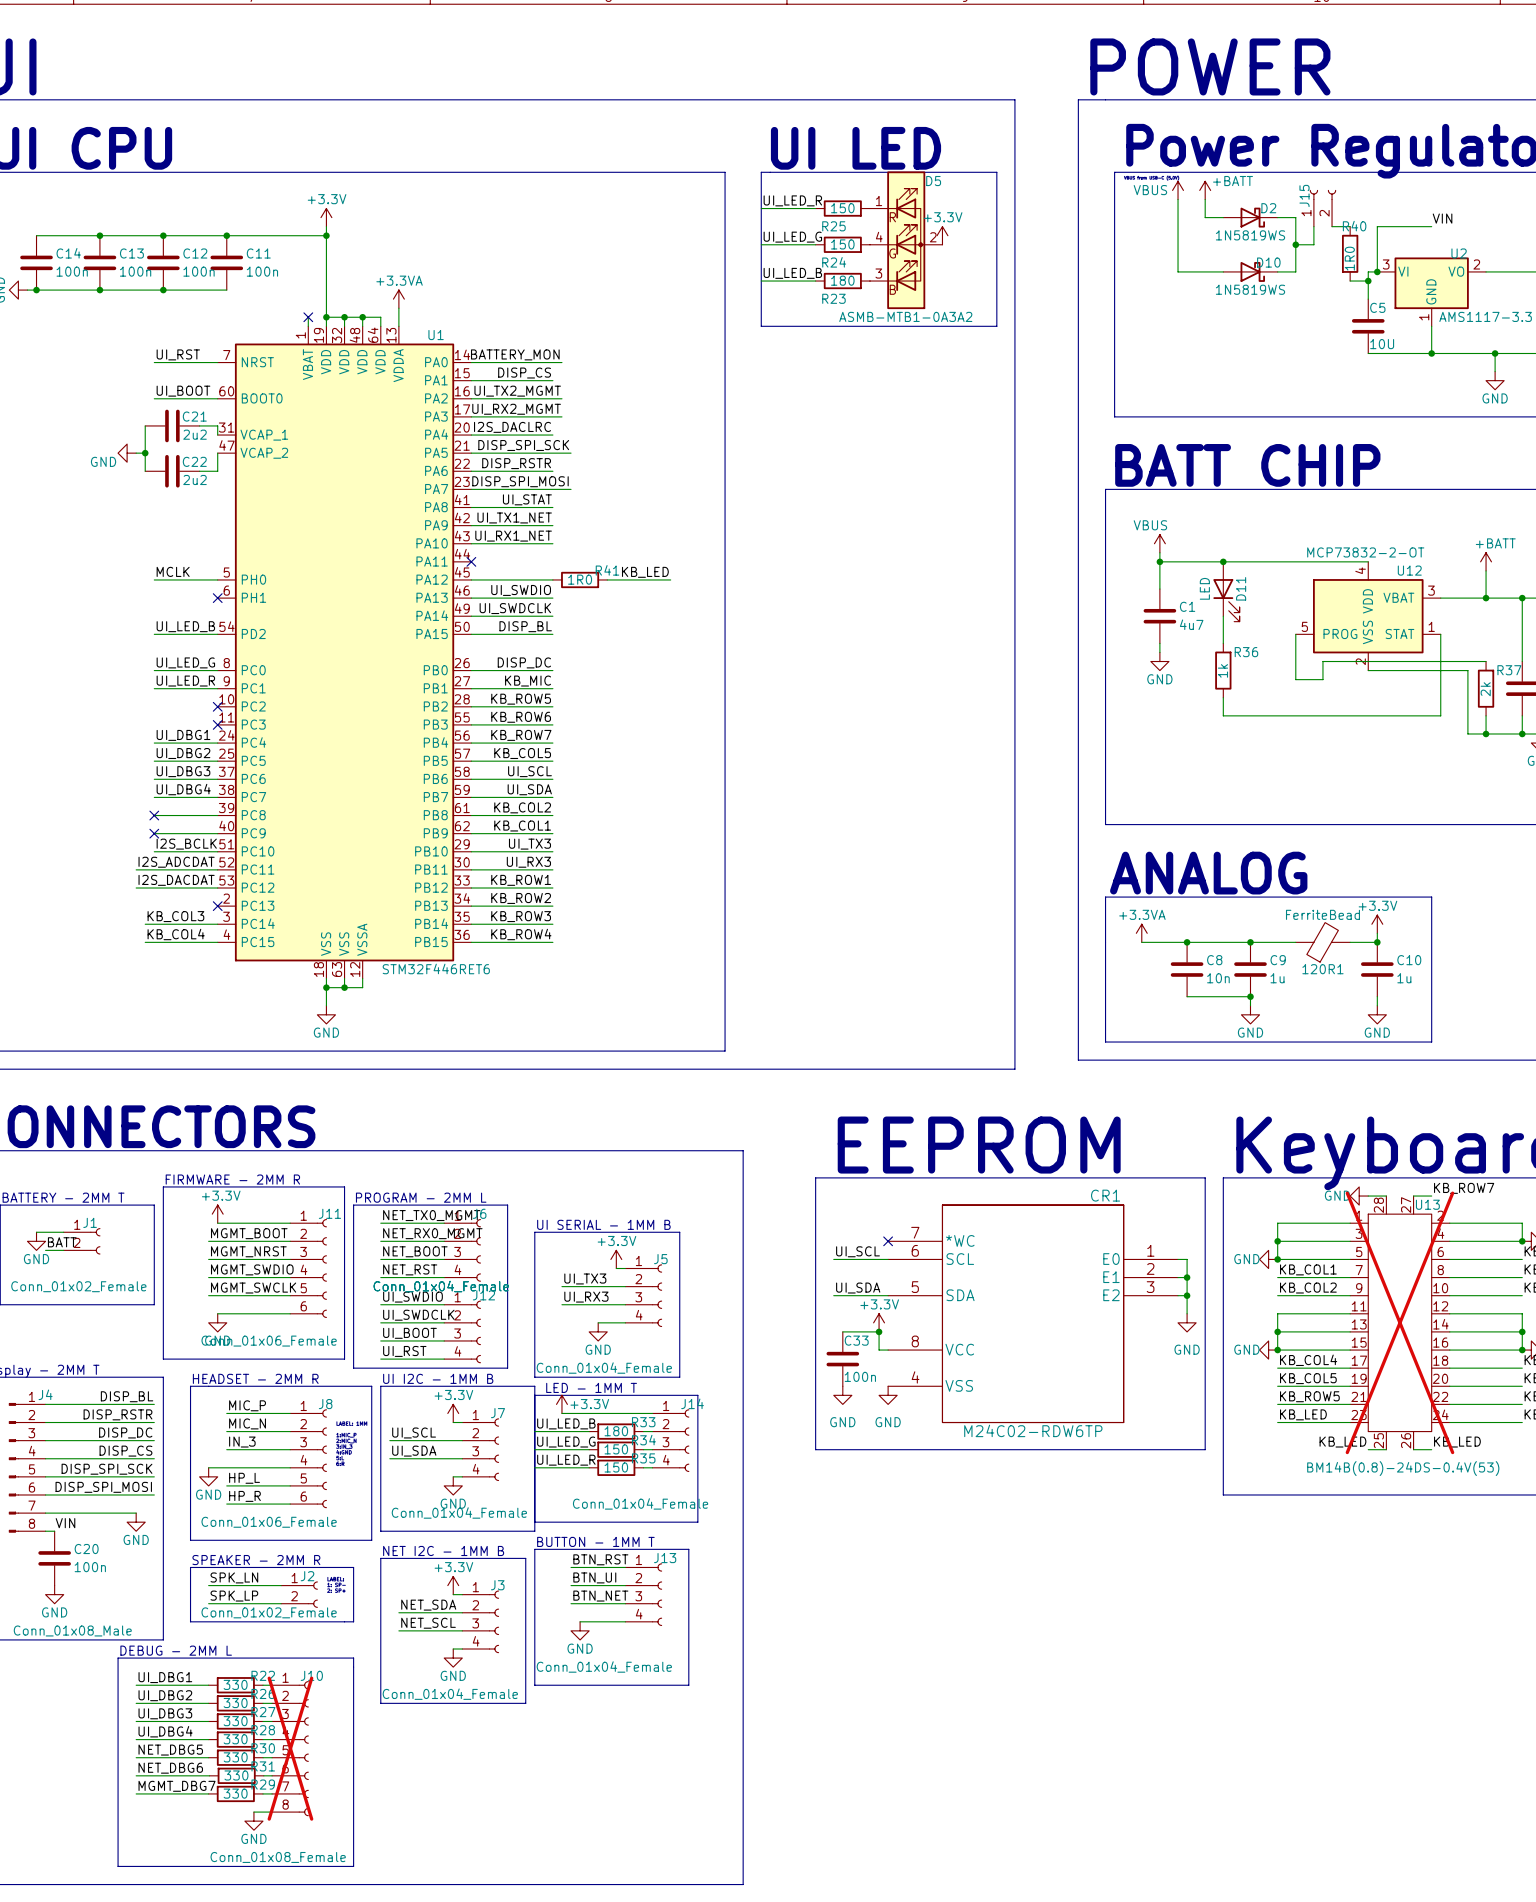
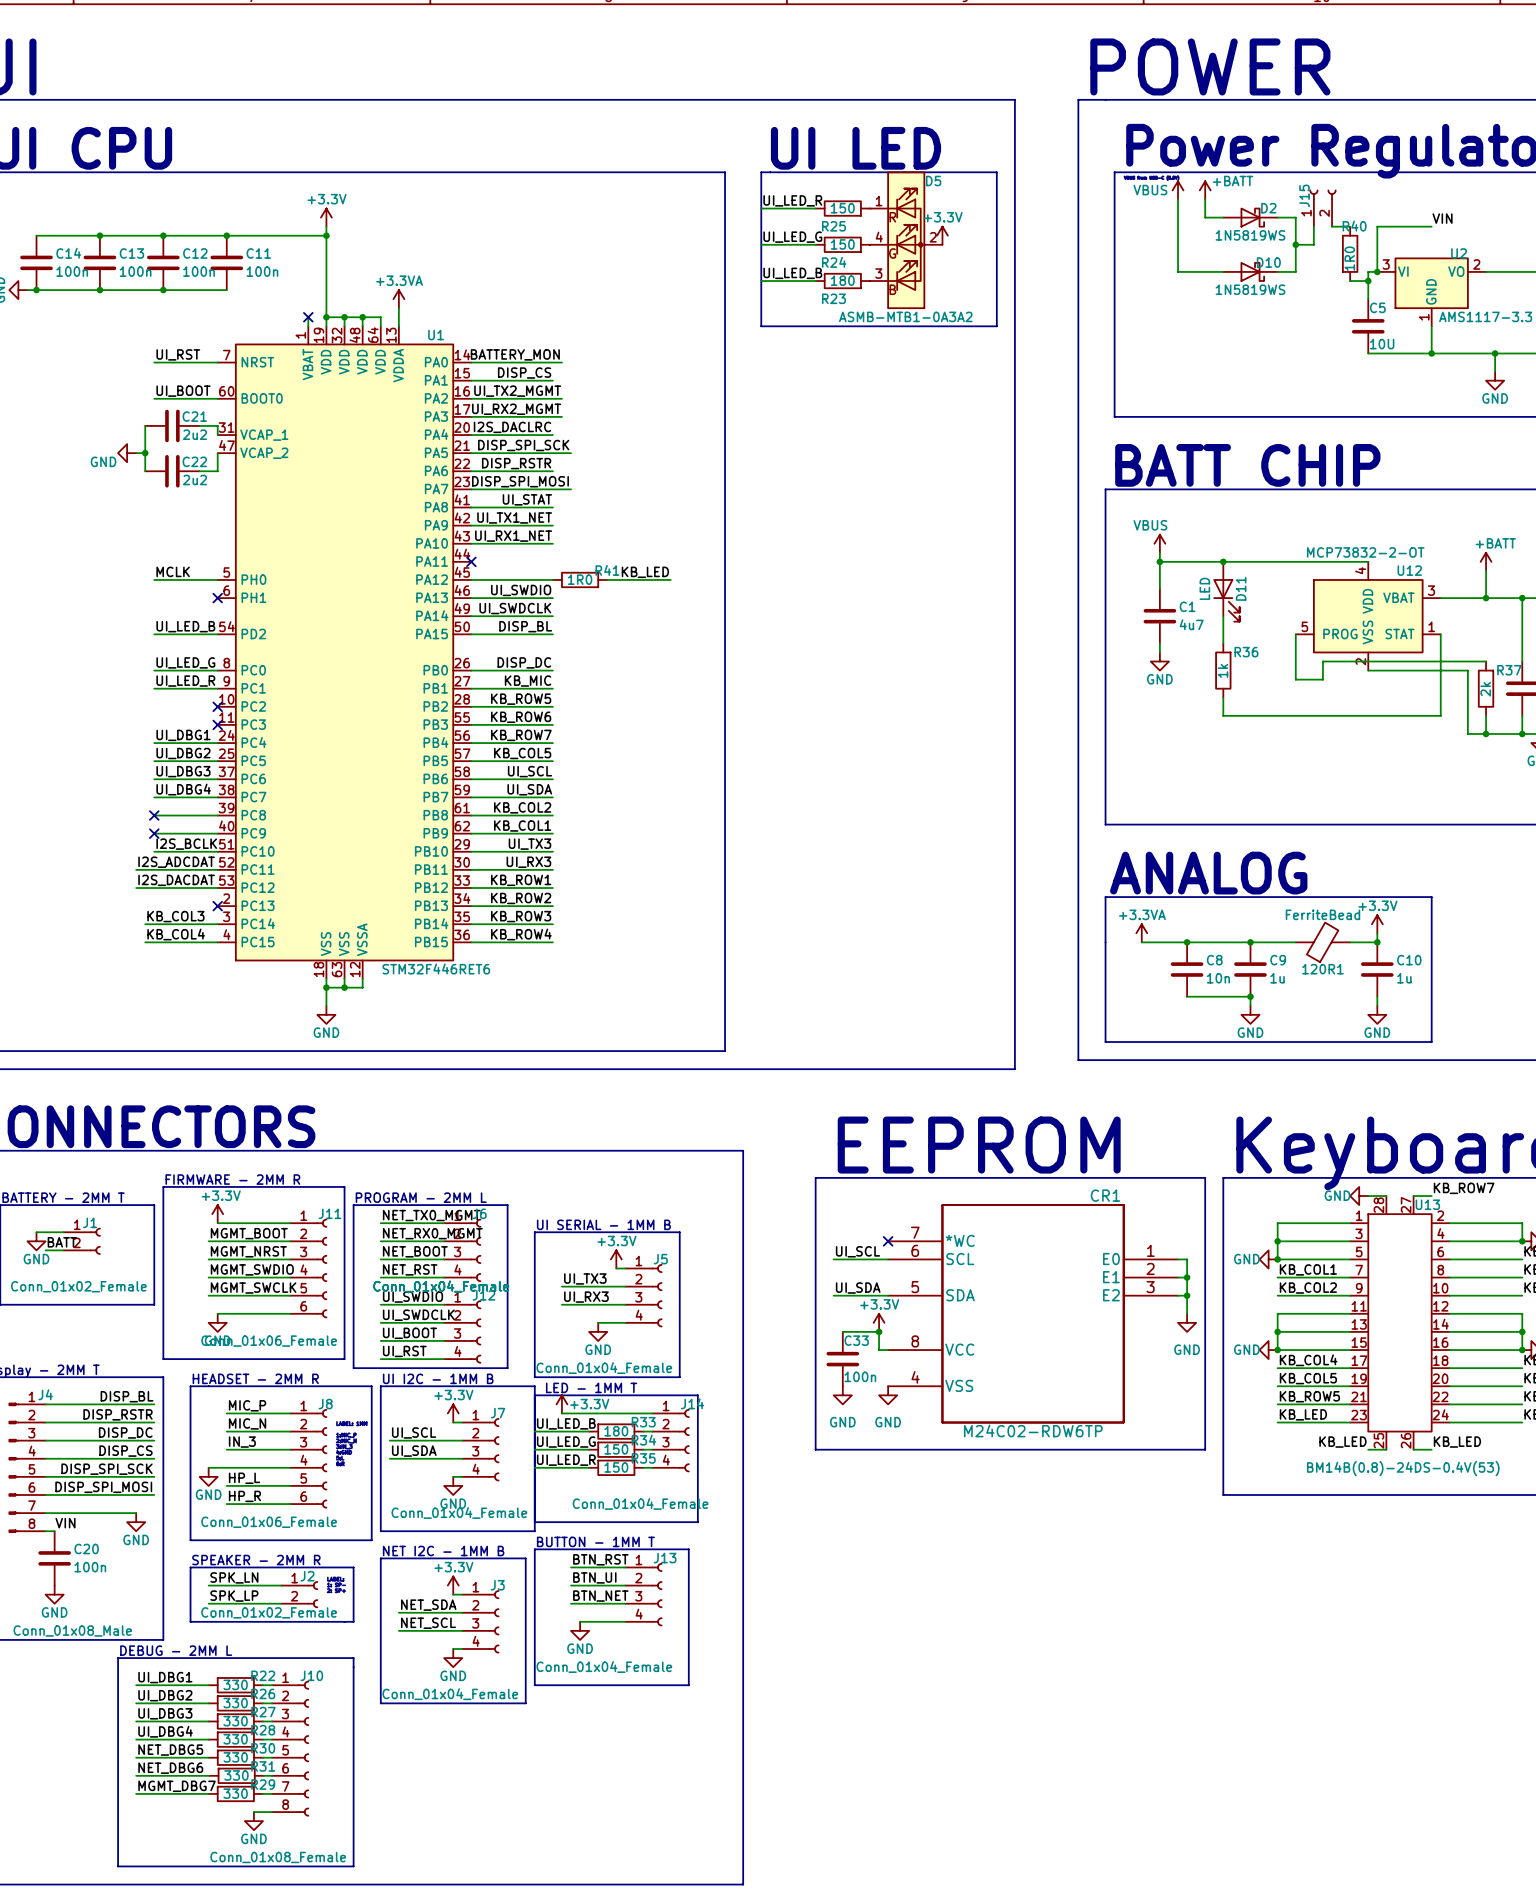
U13 do-not-place cross: (1399, 1322) -> none
J10 do-not-place cross: (290, 1748) -> none

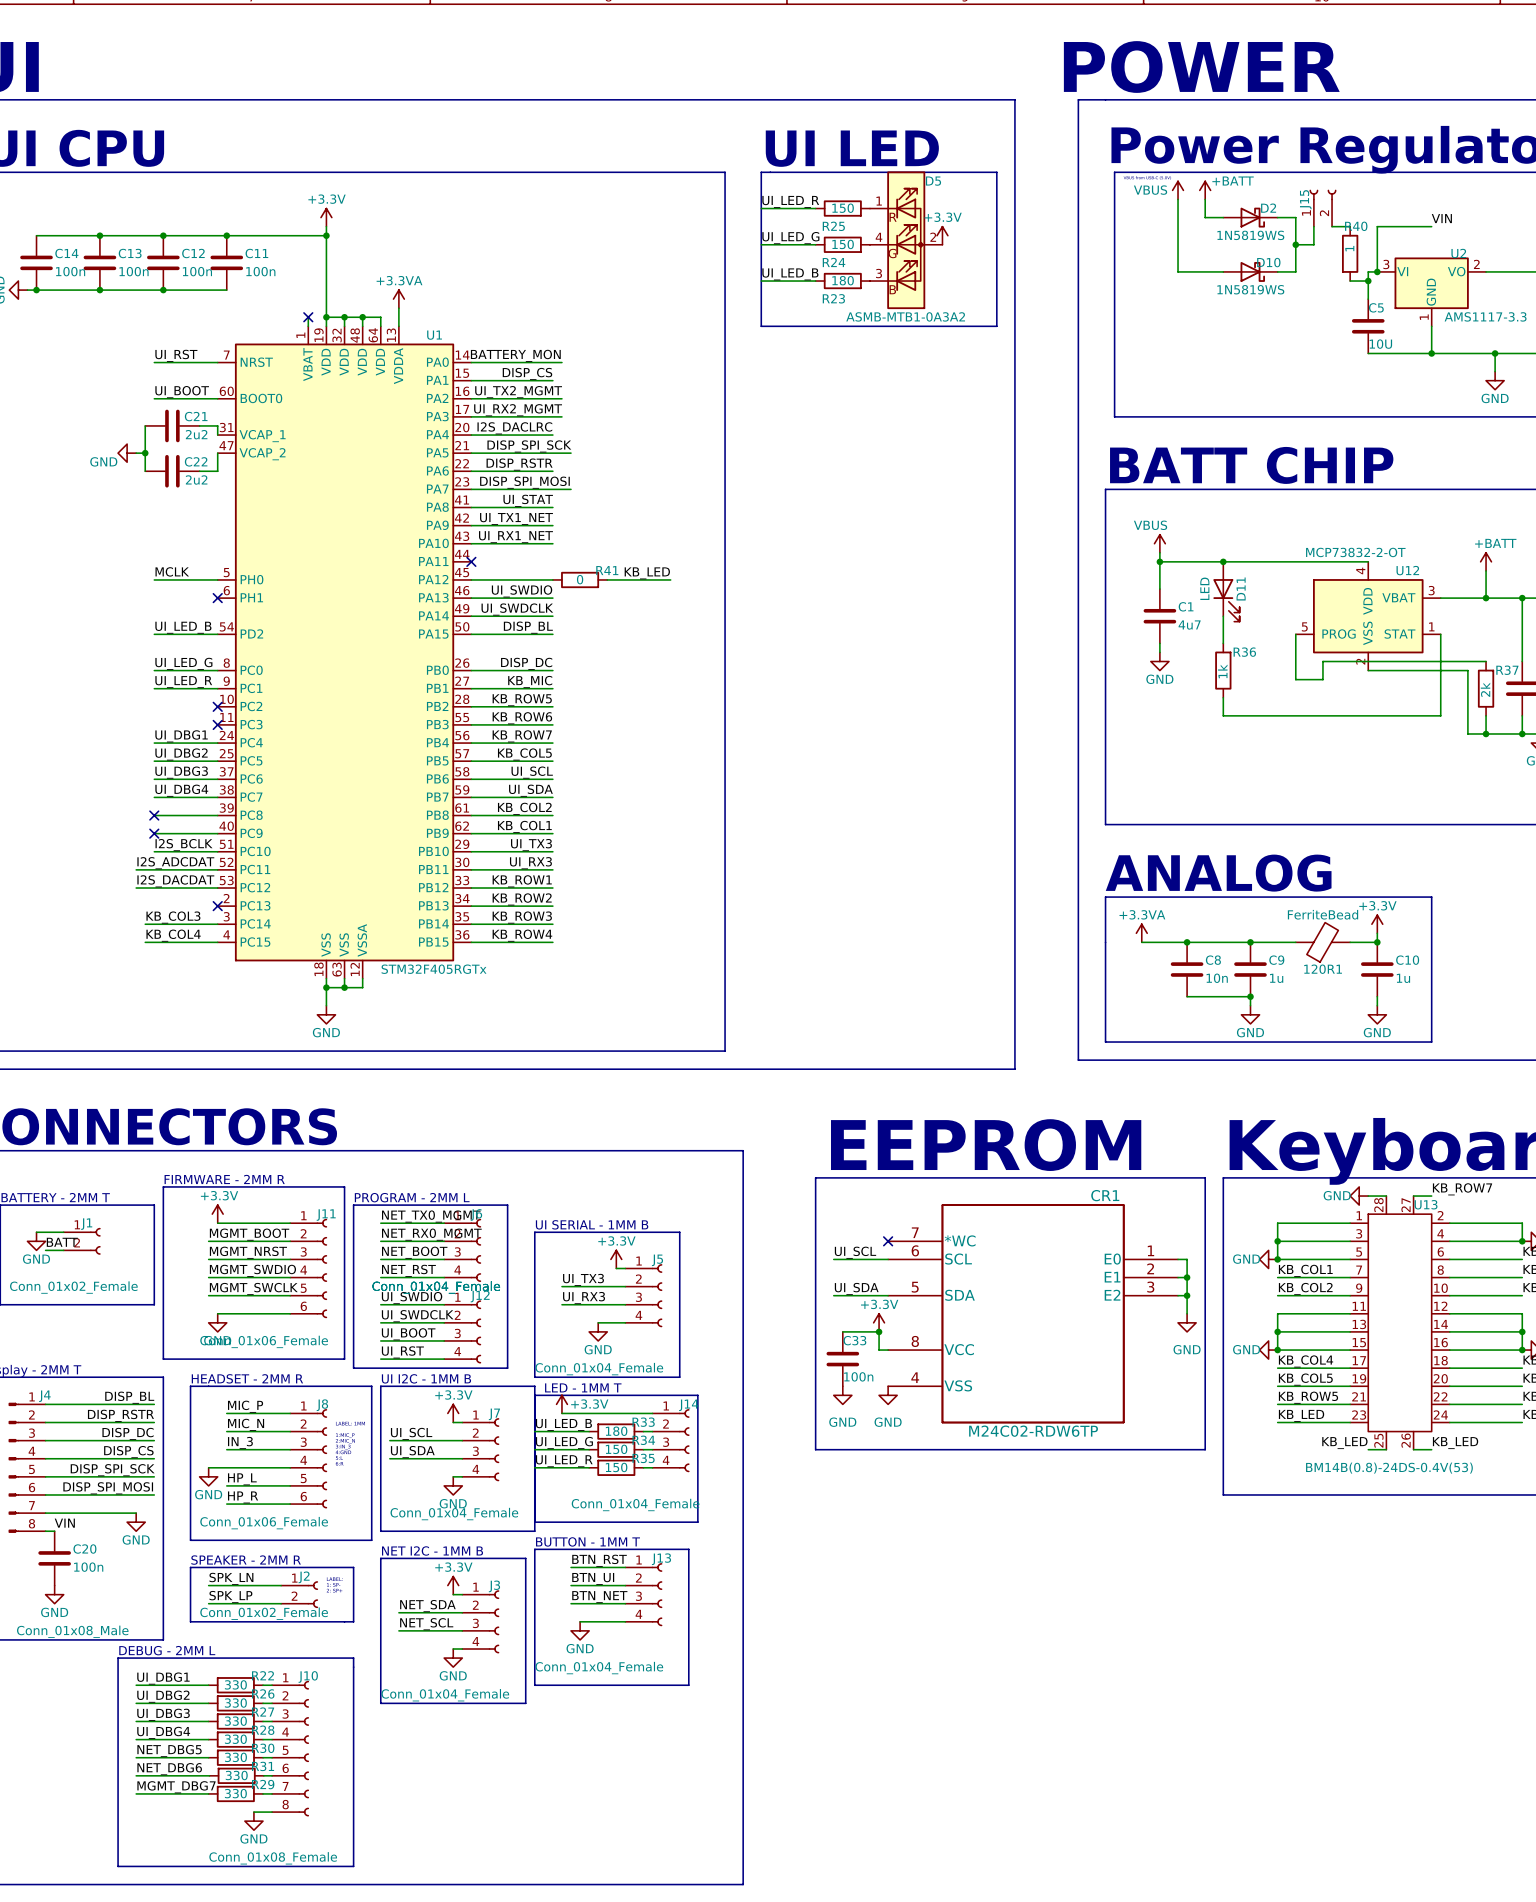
R40 value: 1R0 (1349, 258) -> 1 (1349, 248)
R41 value: 1R0 (580, 579) -> 0 (580, 579)
U1 value: STM32F446RET6 (436, 968) -> STM32F405RGTx (434, 969)

